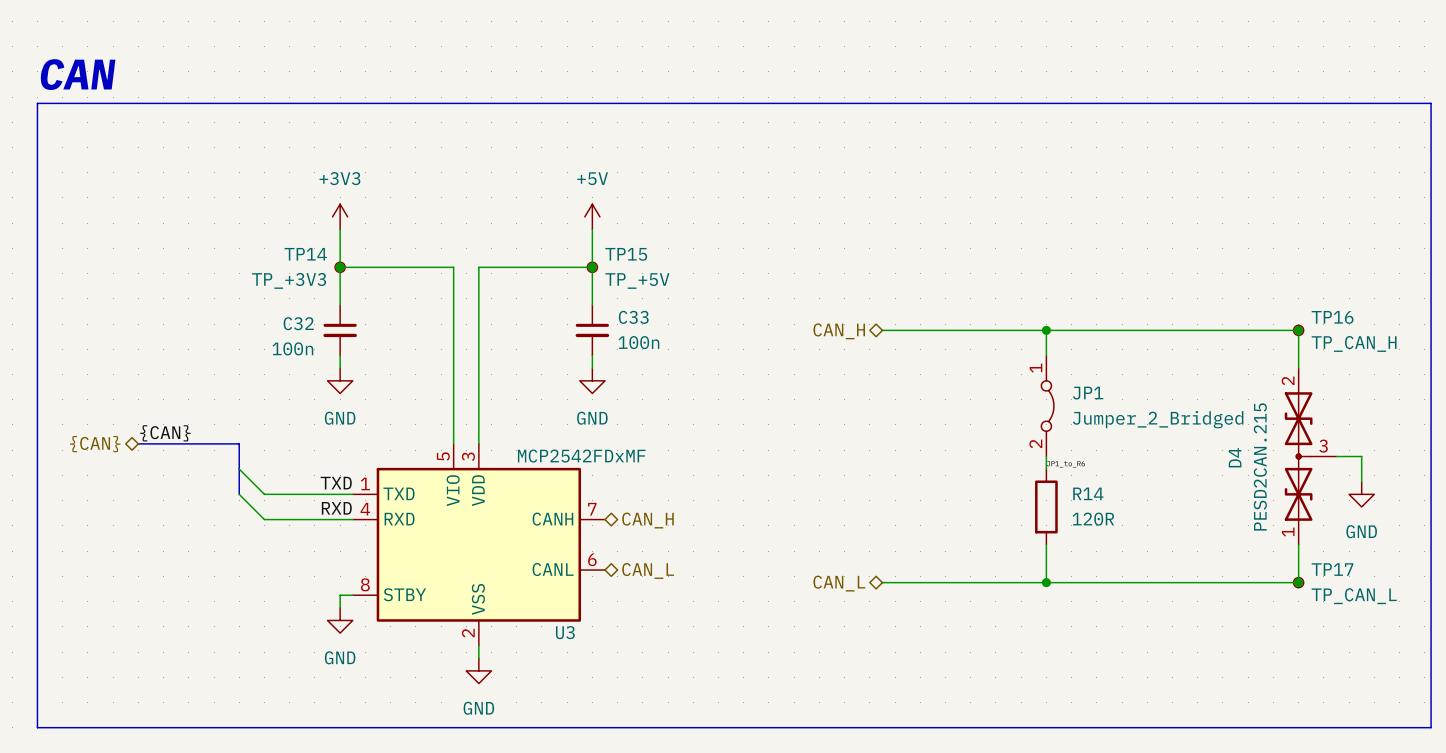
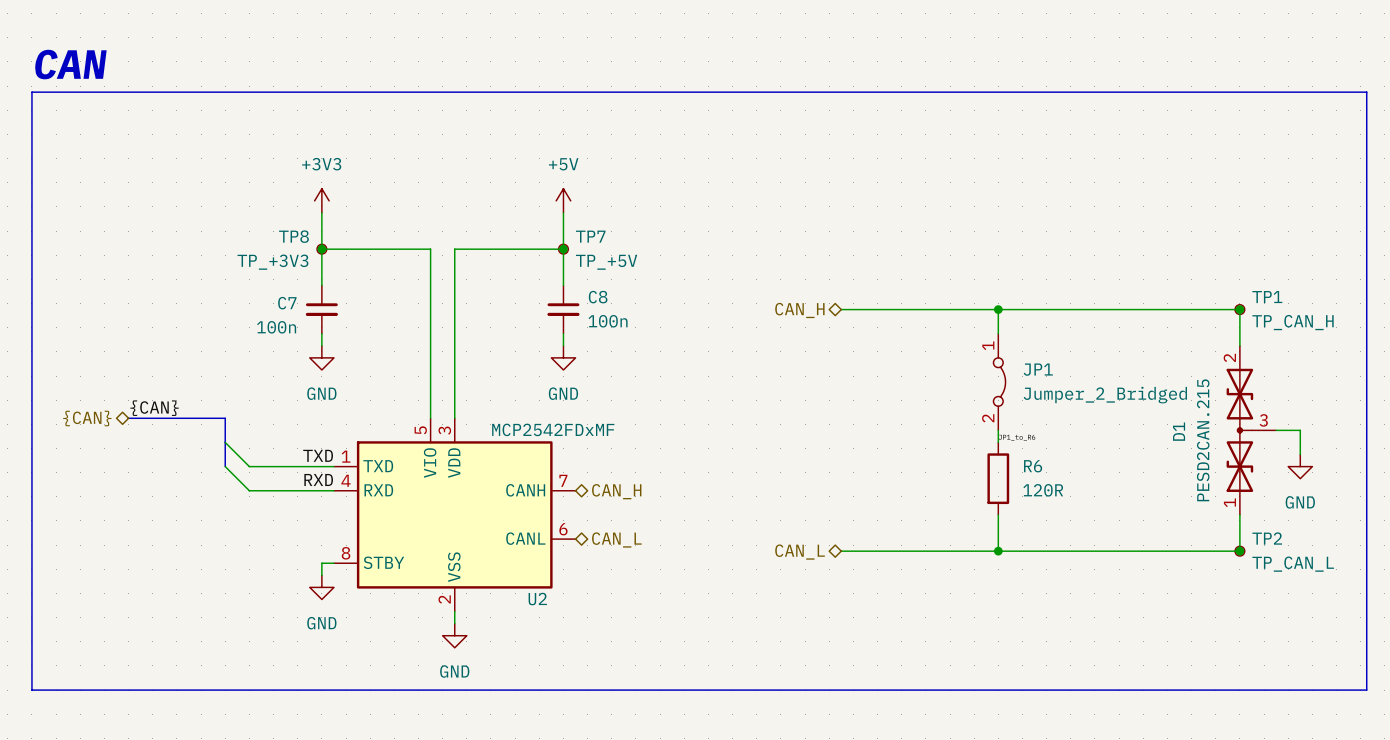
TP14 name: TP14 (305, 254) -> TP8 (293, 236)
TP15 name: TP15 (626, 254) -> TP7 (590, 236)
C33 name: C33 (633, 317) -> C8 (598, 297)
TP16 name: TP16 (1332, 317) -> TP1 (1267, 297)
C32 name: C32 (298, 323) -> C7 (287, 303)
D4 name: D4 (1235, 457) -> D1 (1179, 431)
R14 name: R14 (1088, 493) -> R6 (1033, 466)
TP17 name: TP17 (1332, 569) -> TP2 (1267, 538)
U3 name: U3 (565, 632) -> U2 (537, 599)

